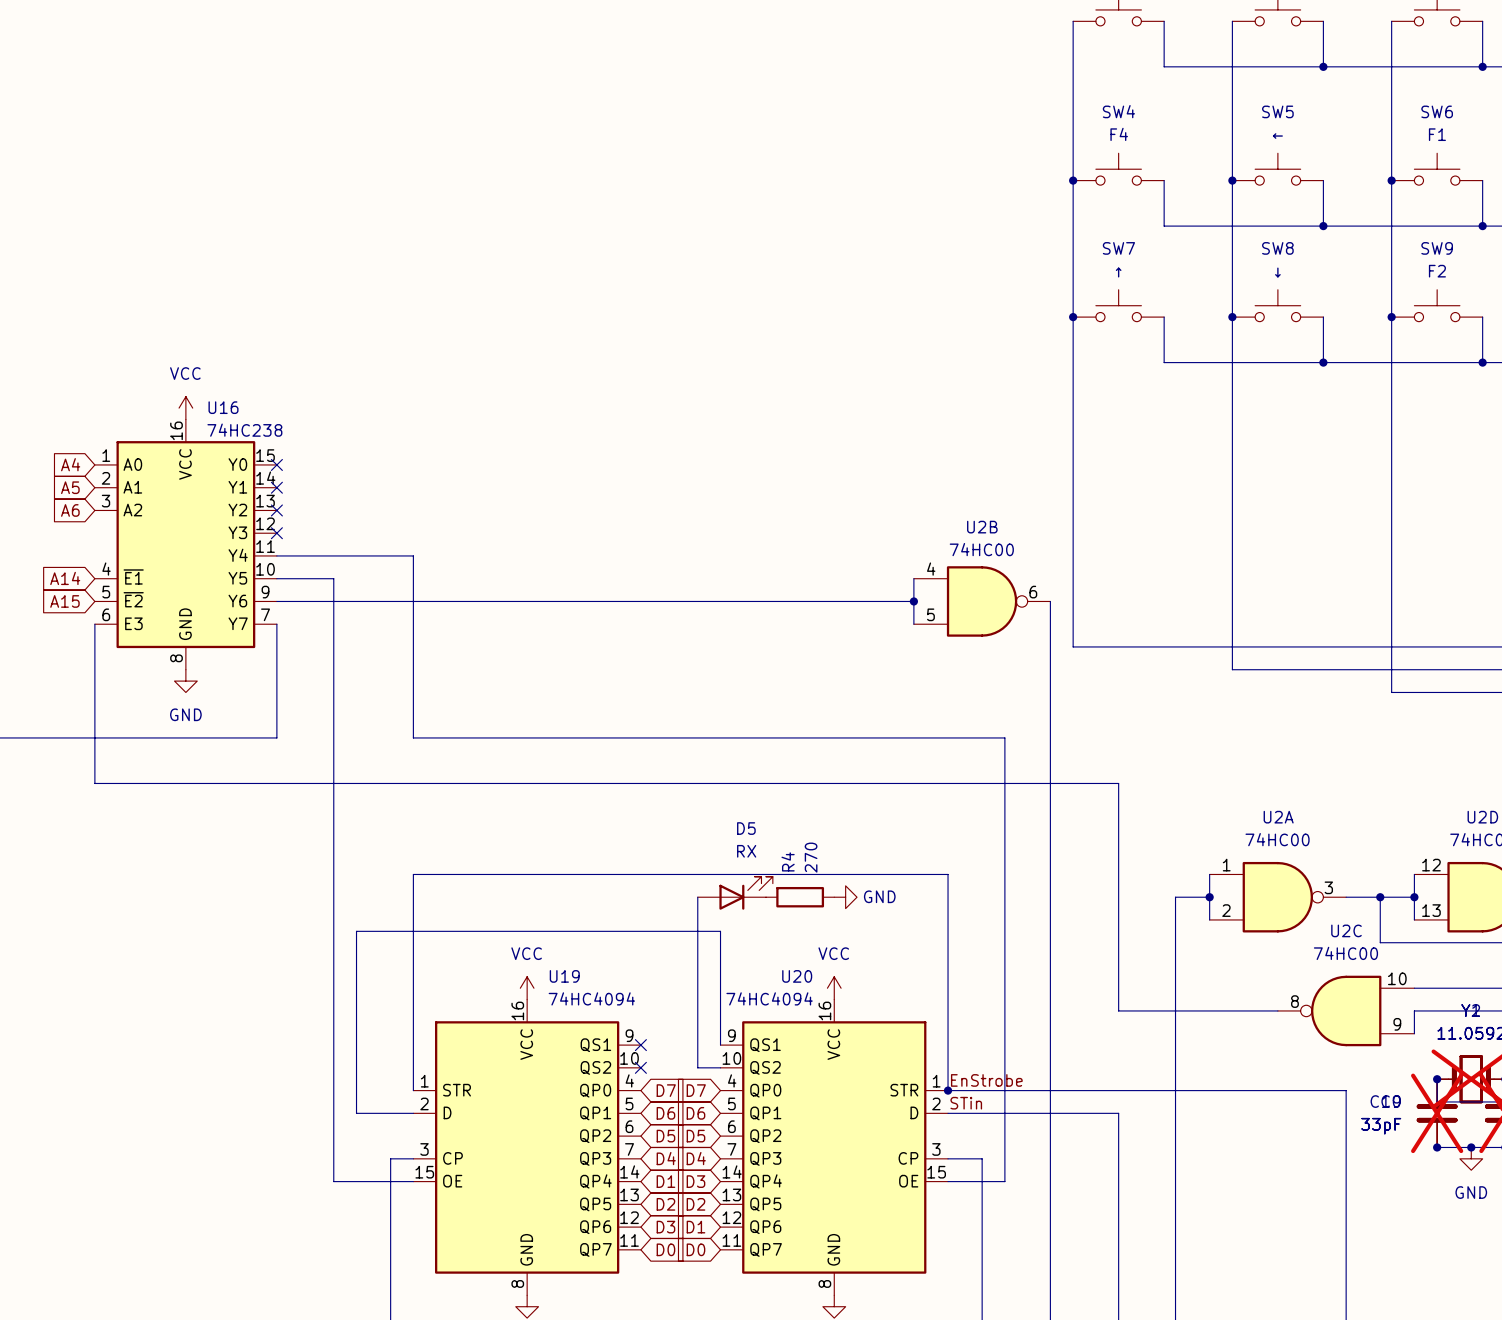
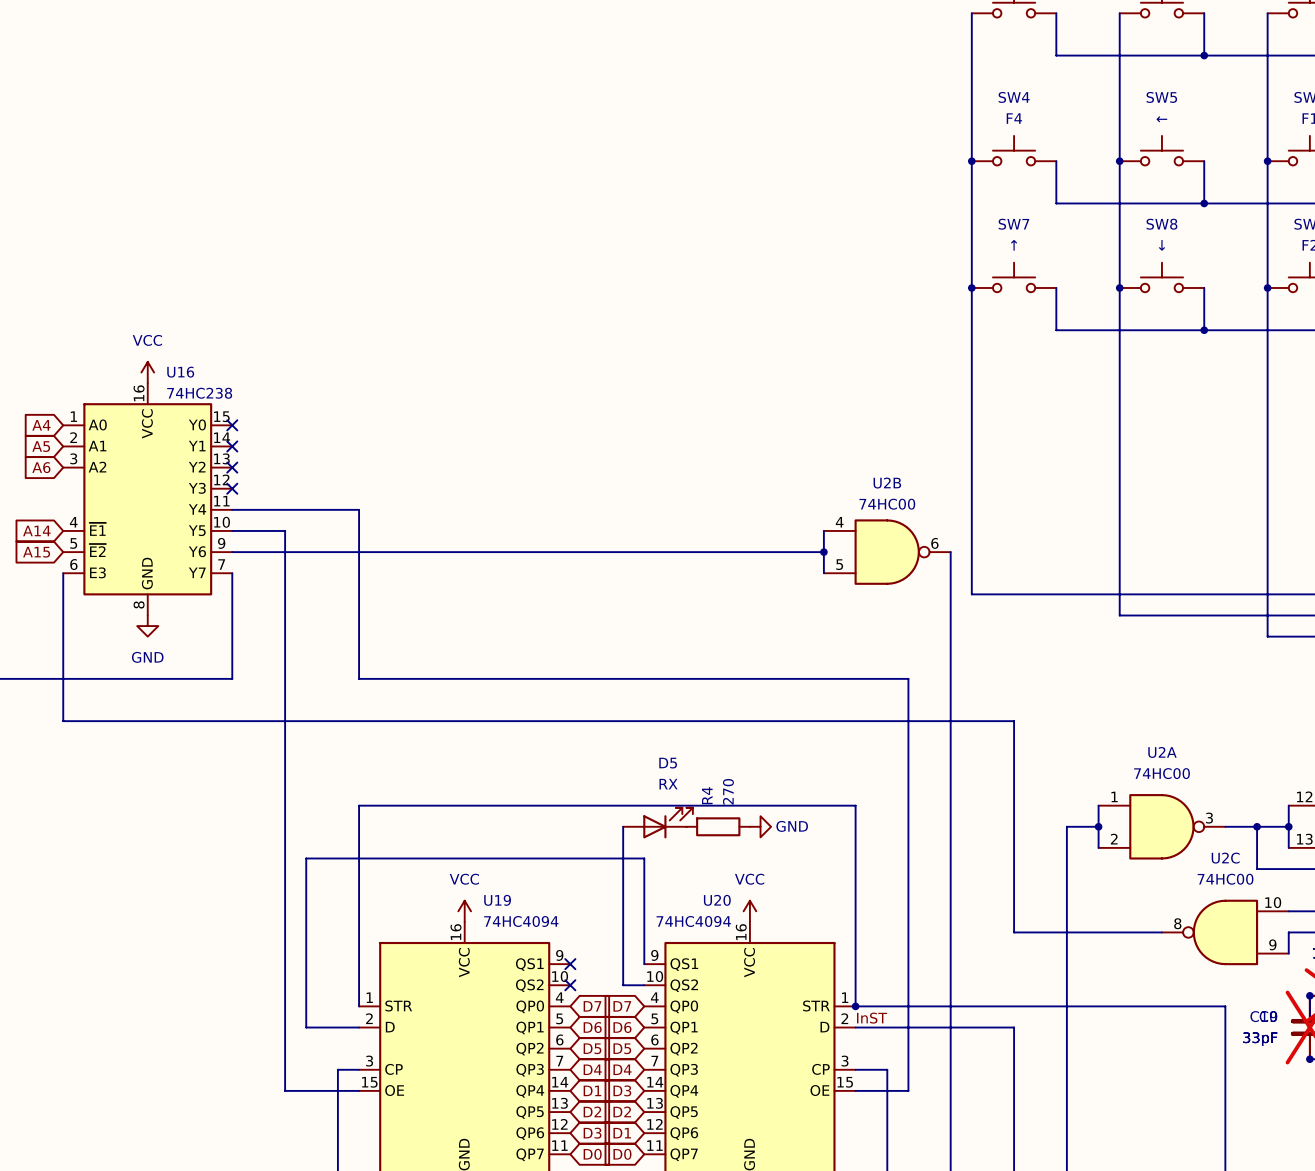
label: EnStrobe (986, 1080) -> none
label: STin (966, 1103) -> InST (872, 1018)

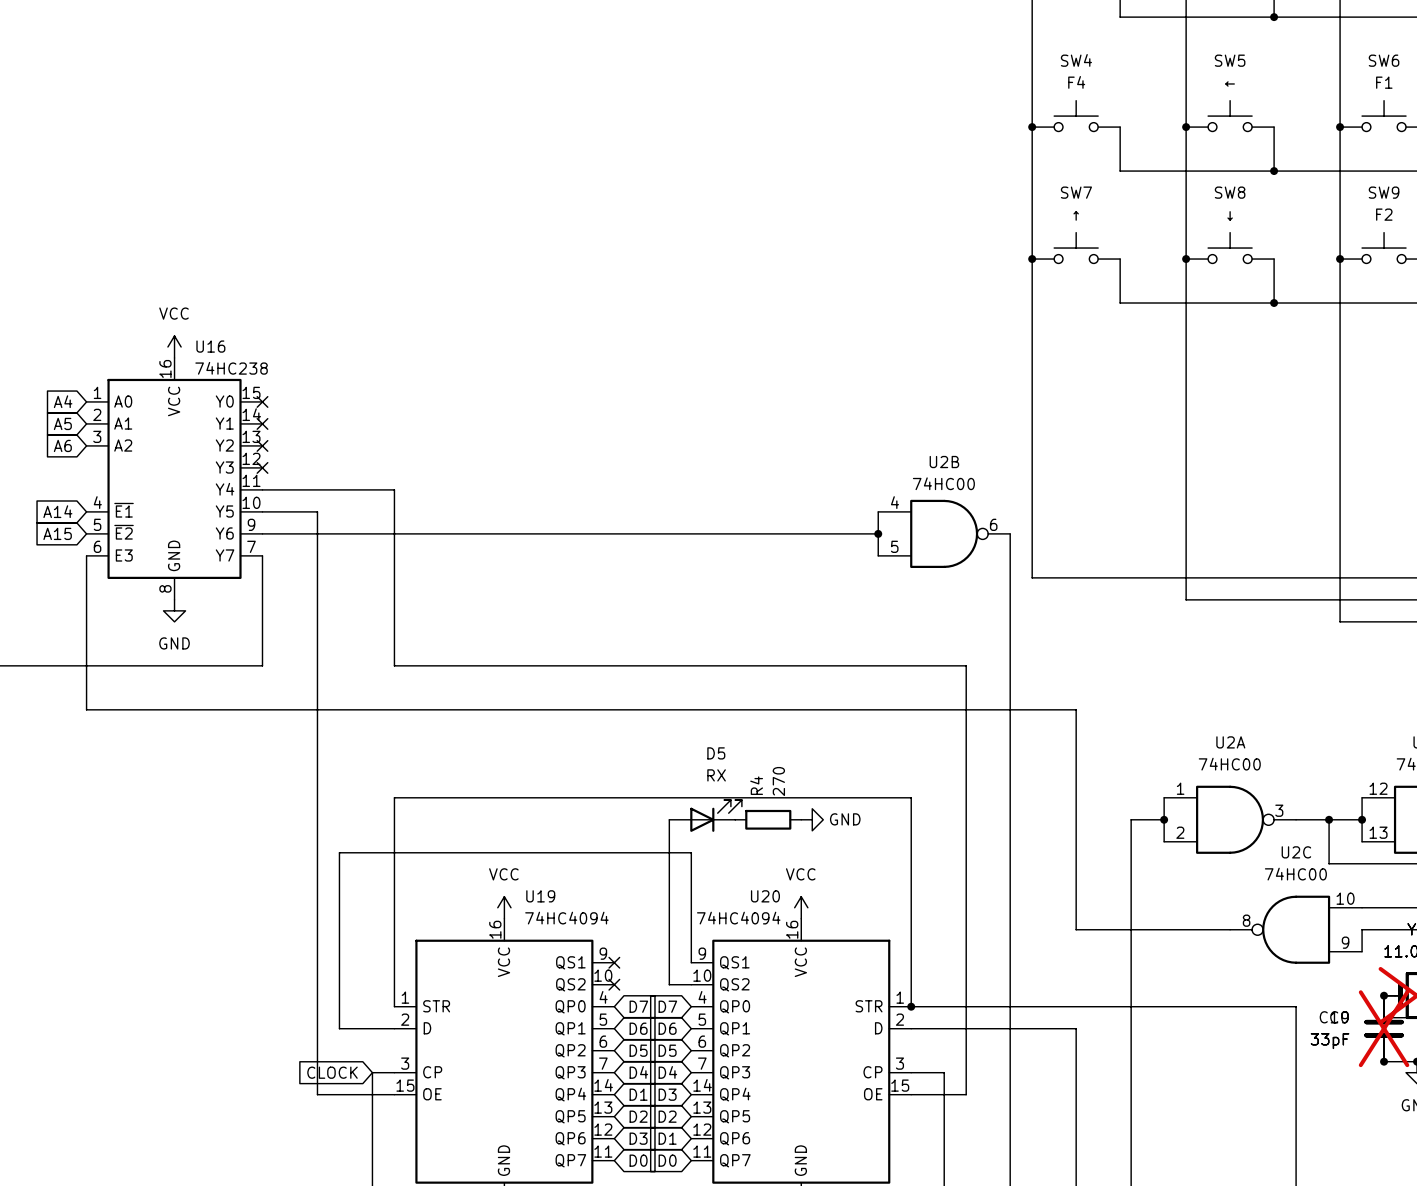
label: InST (872, 1018) -> none
global label: none -> CLOCK (332, 1072)

